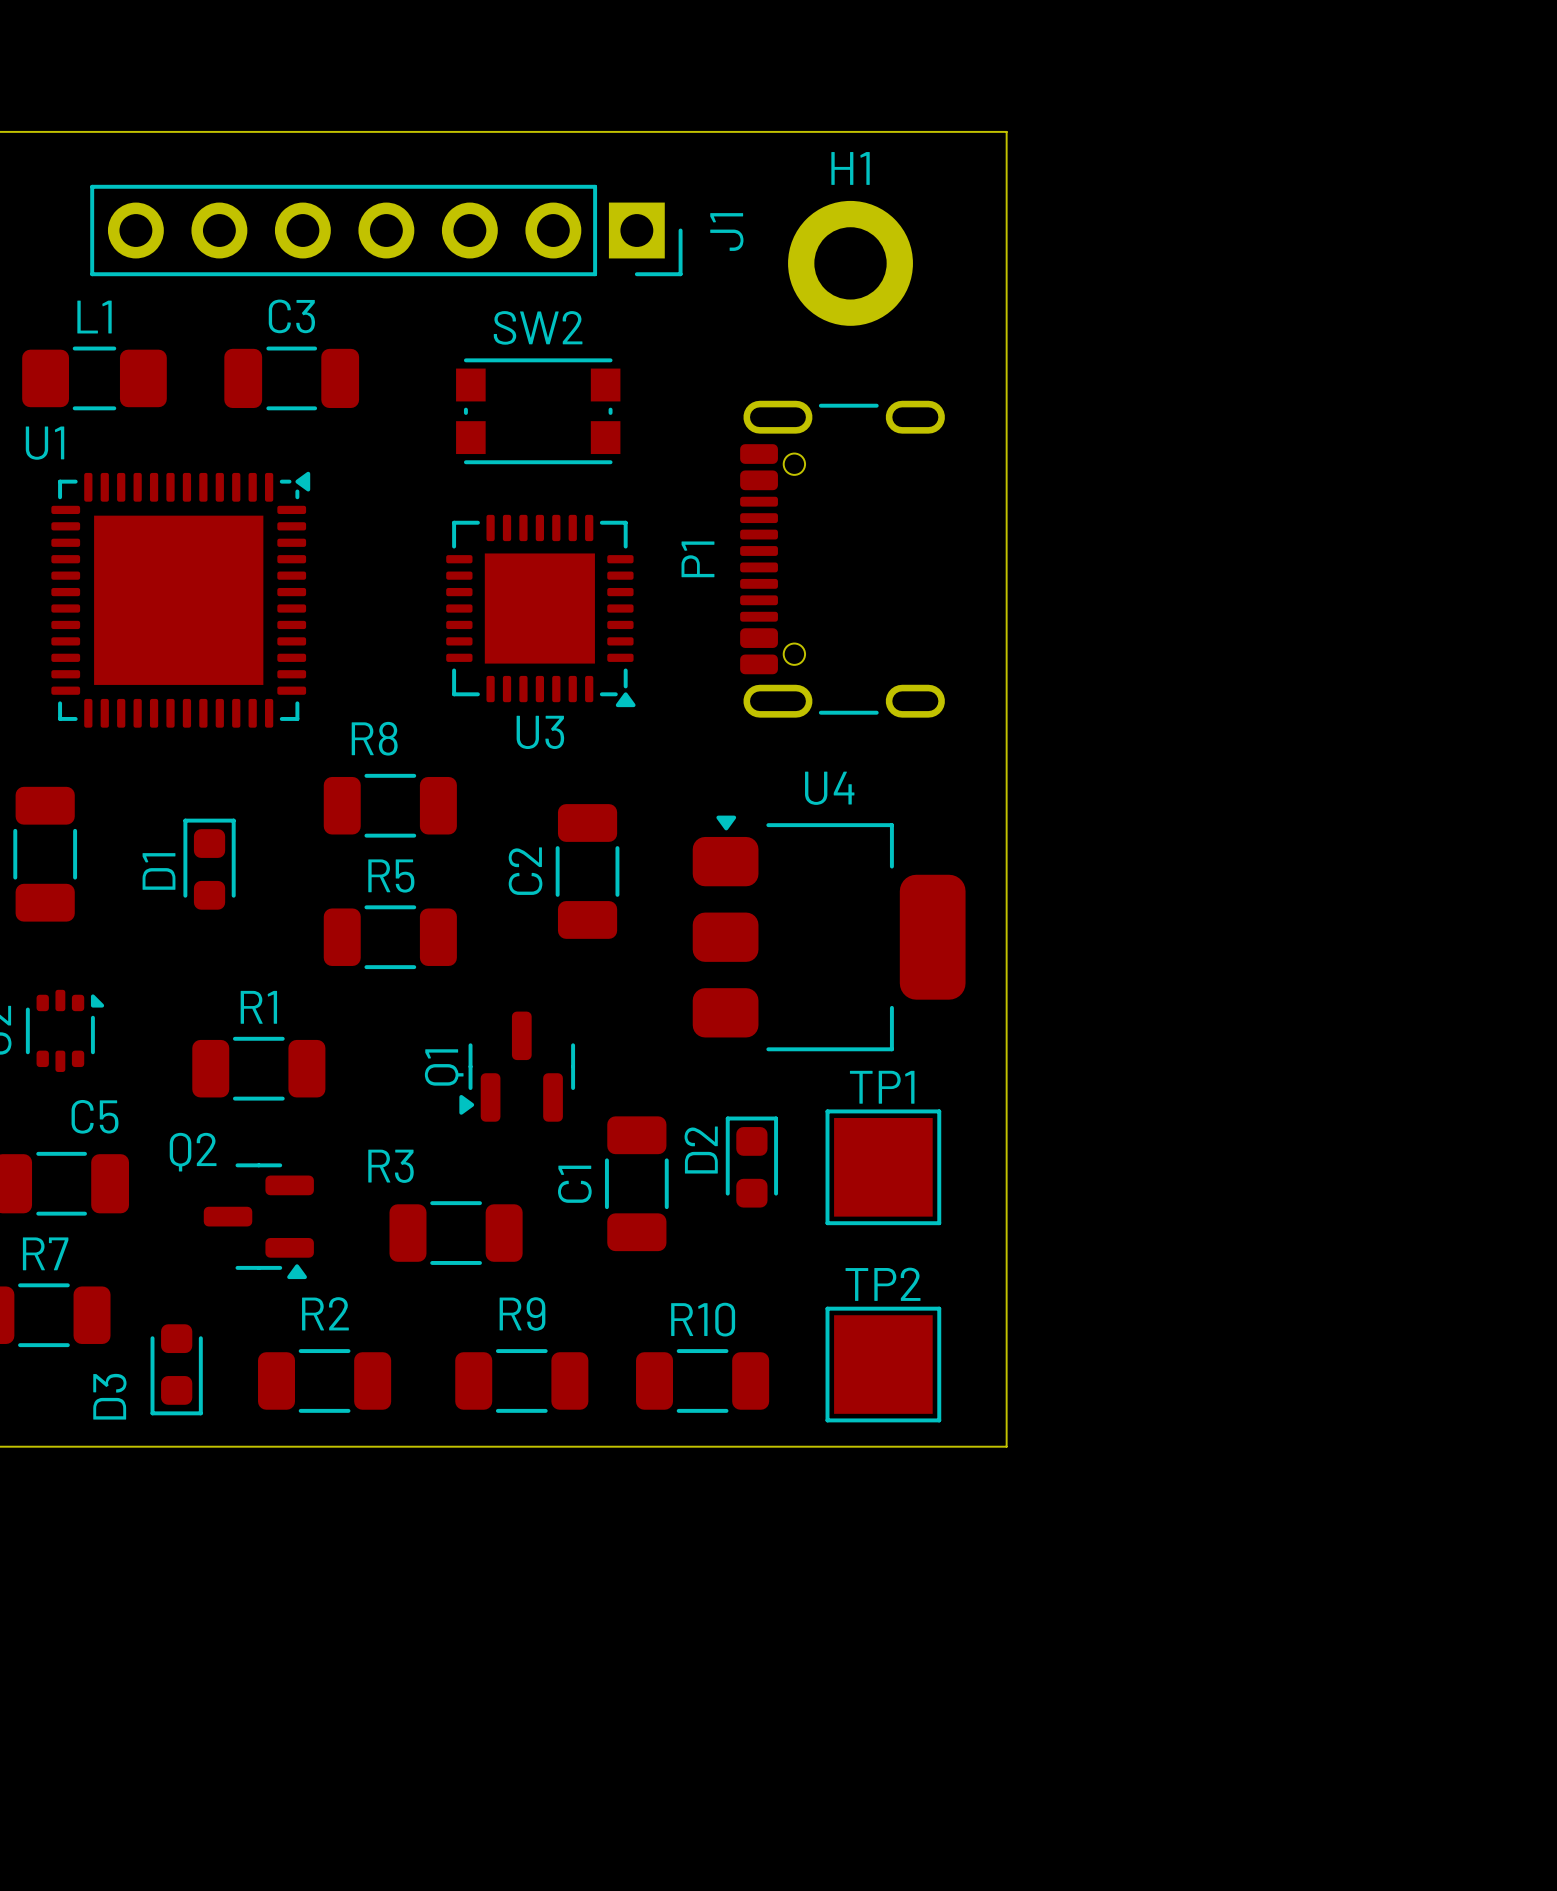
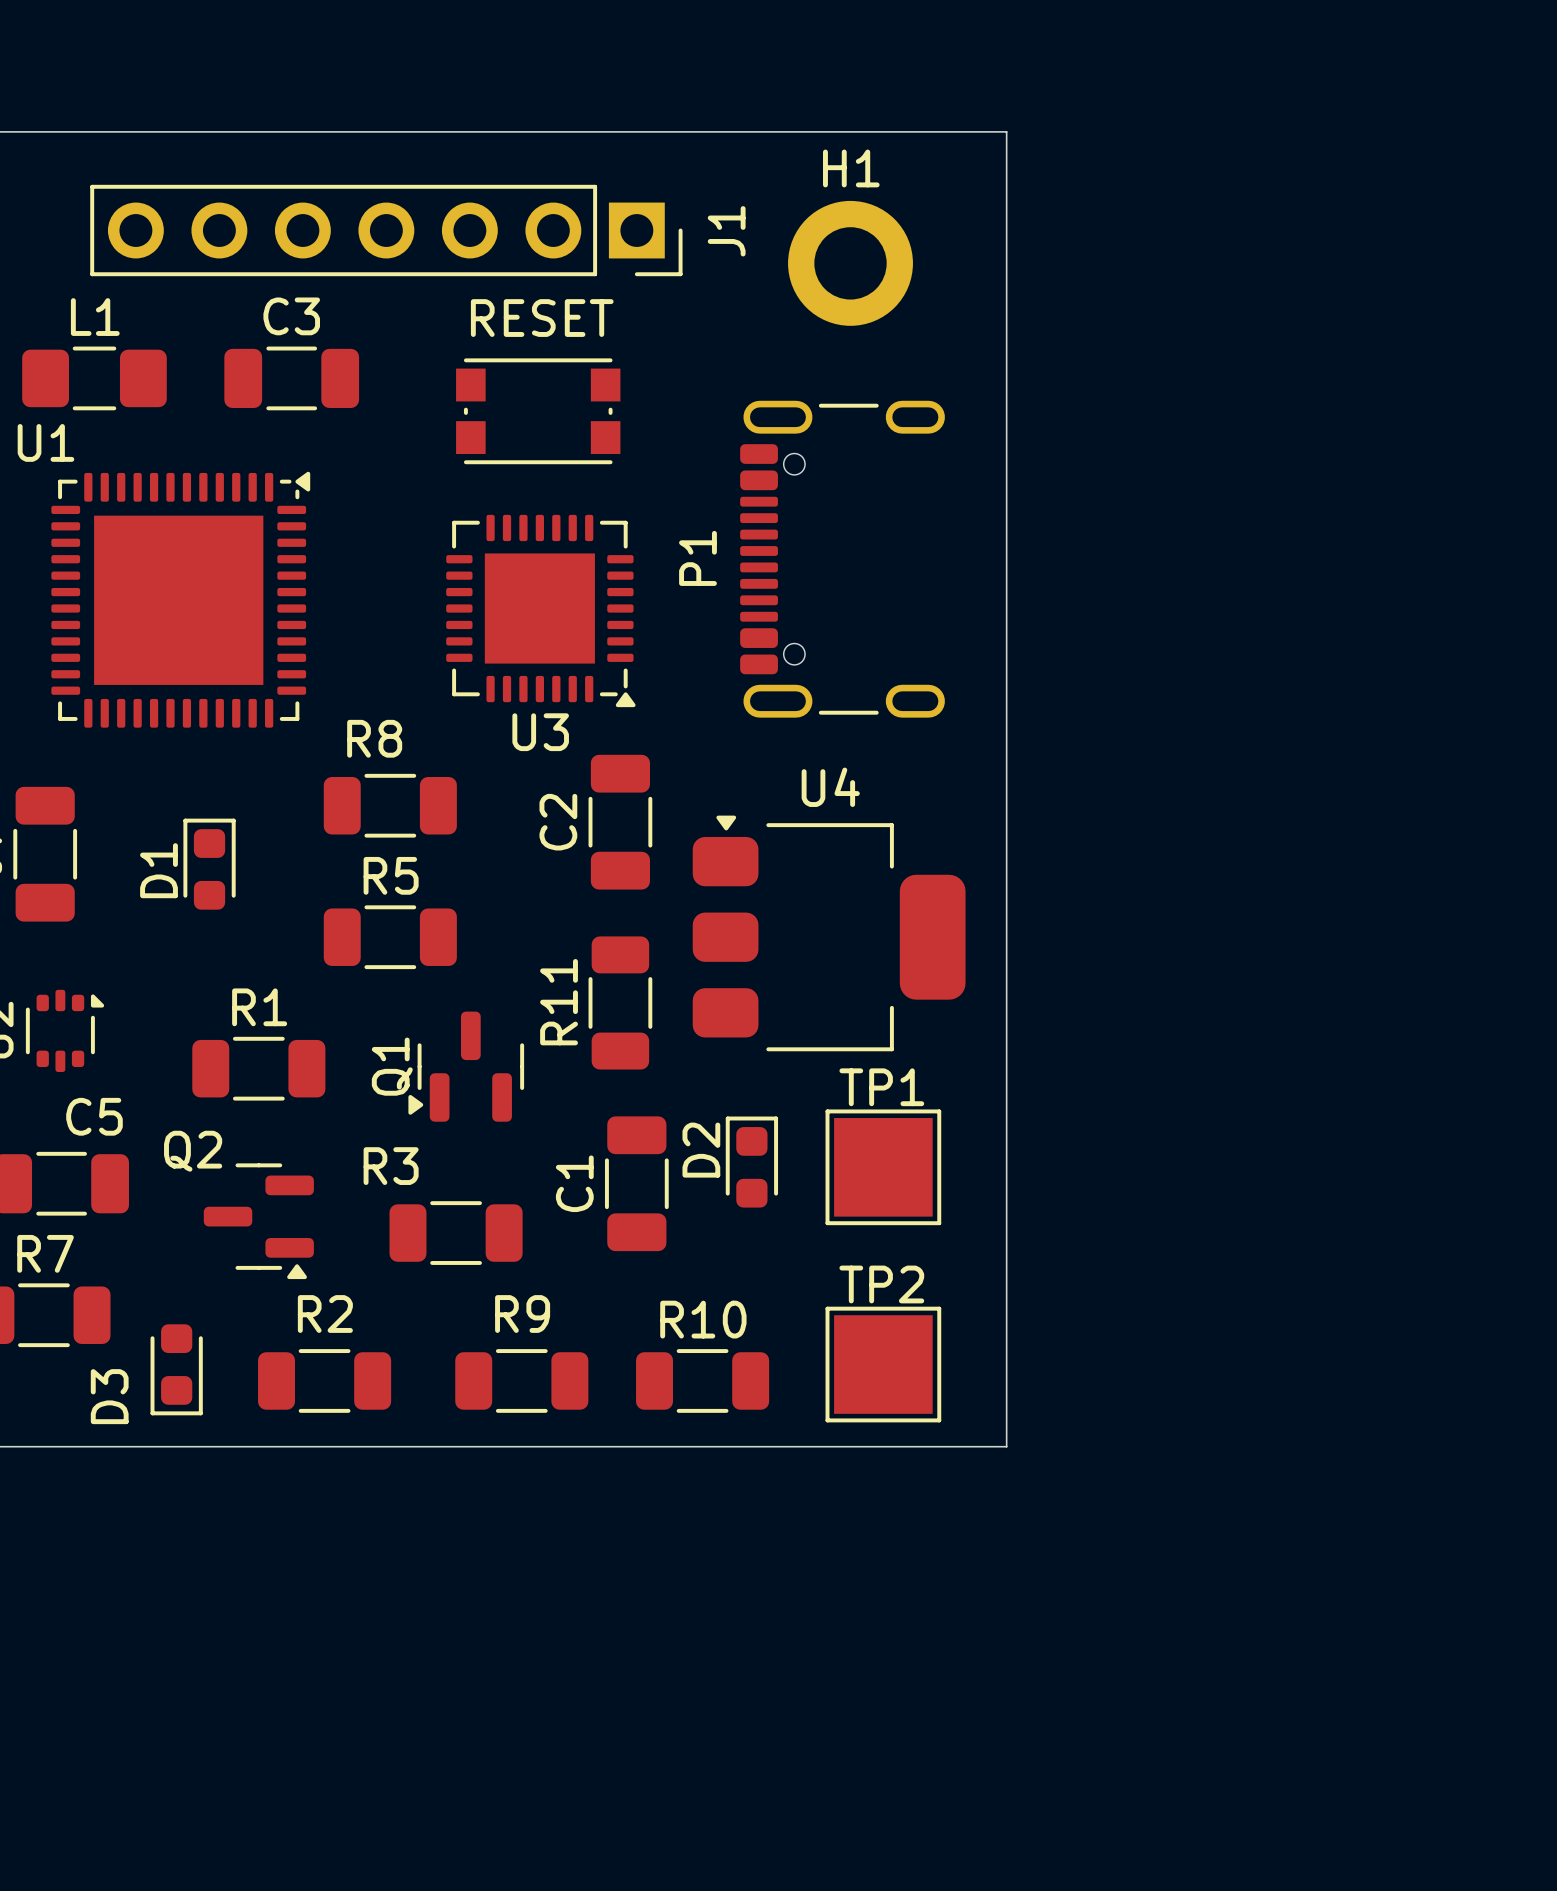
SW2 value: none -> RESET (542, 318)
SW2 name: SW2 (538, 327) -> none
C2 position: (587, 871) -> (620, 822)
R11: none -> (620, 1002)
Q1 position: (517, 1066) -> (466, 1066)

